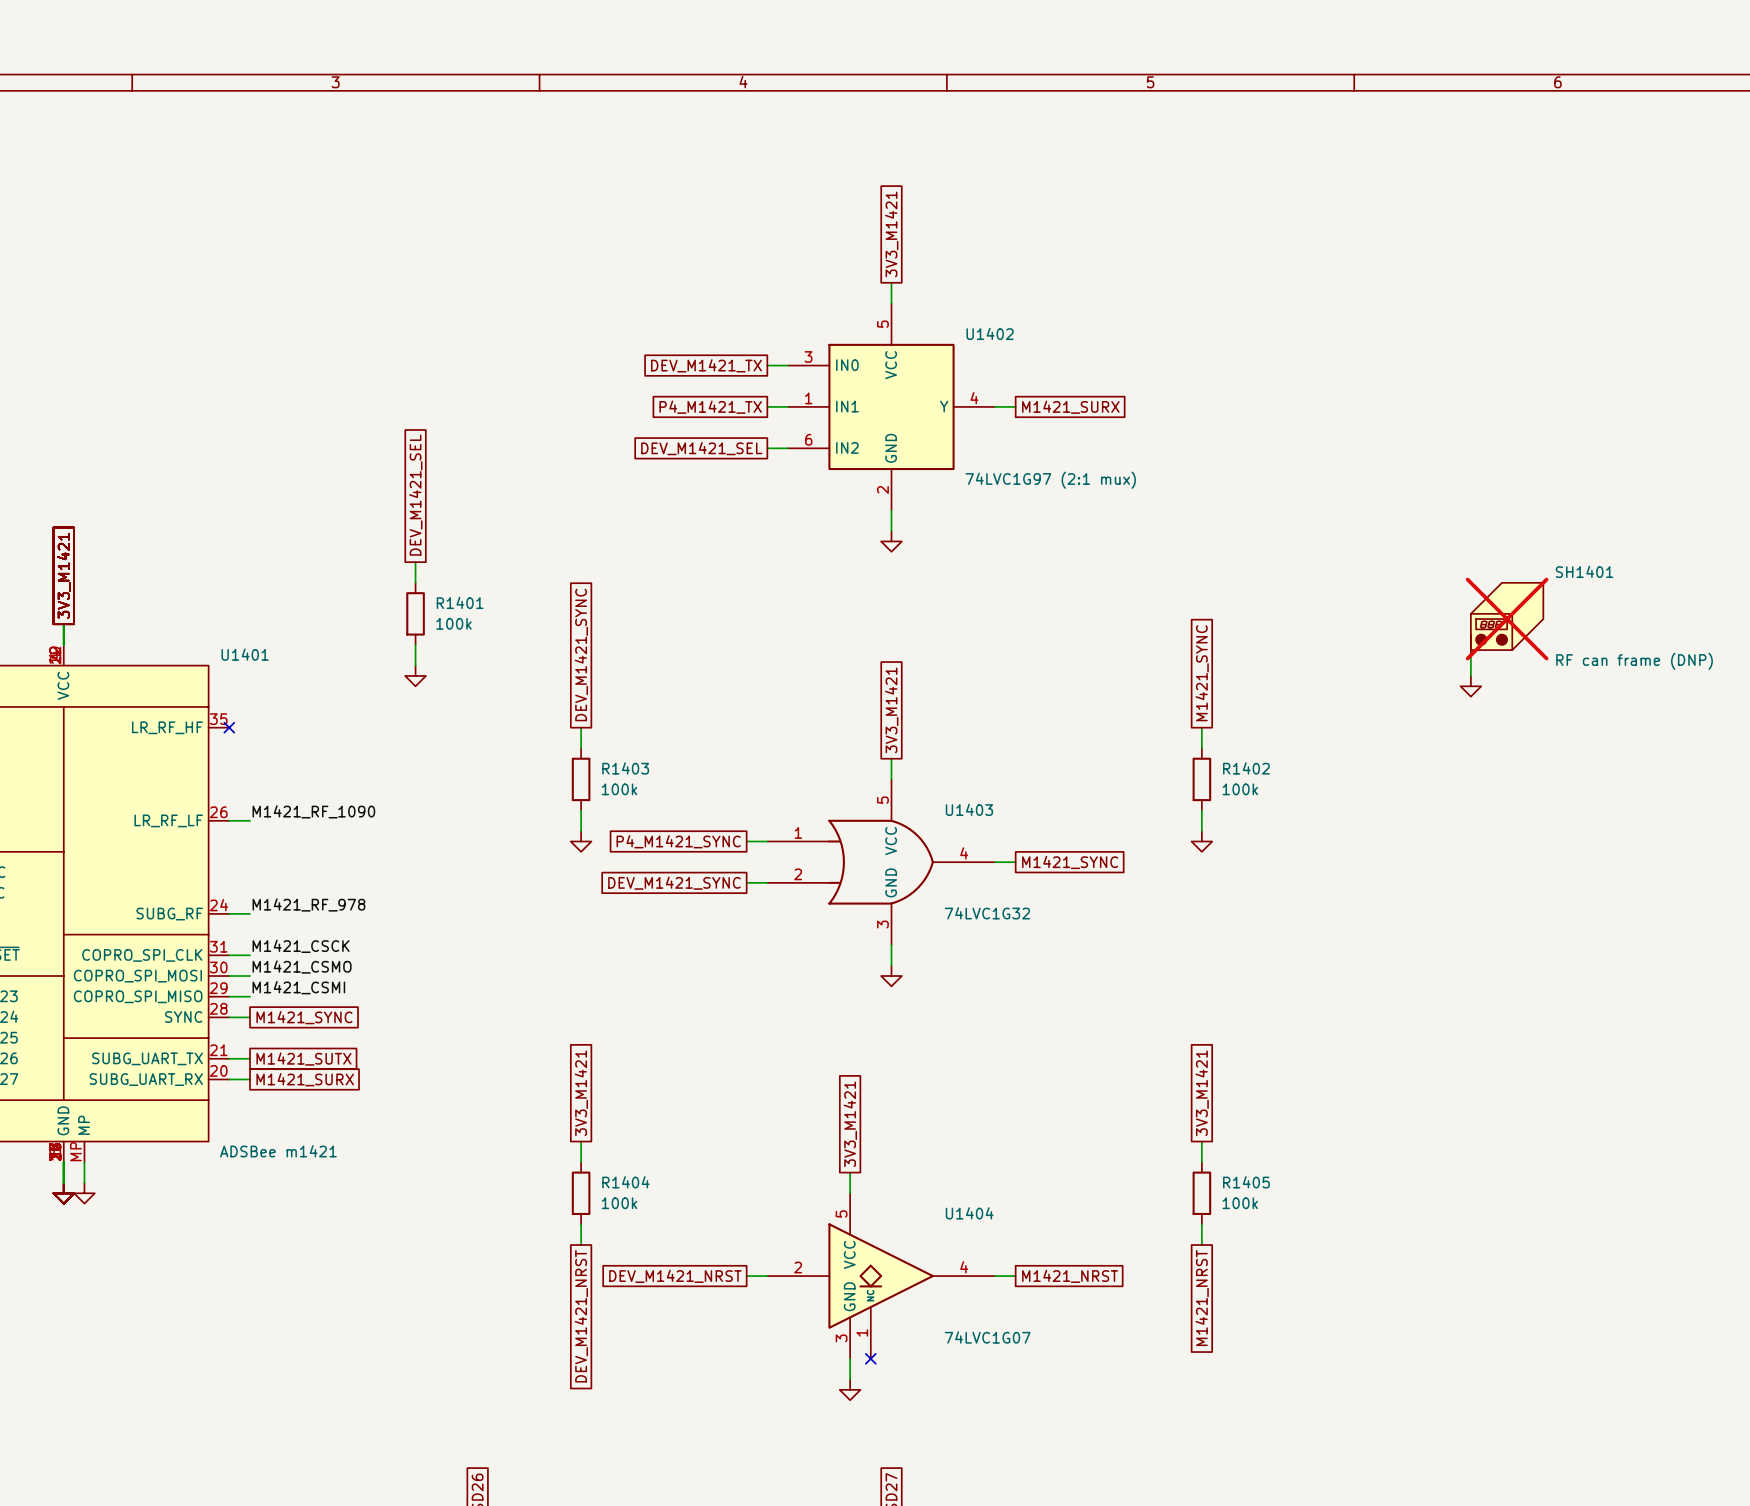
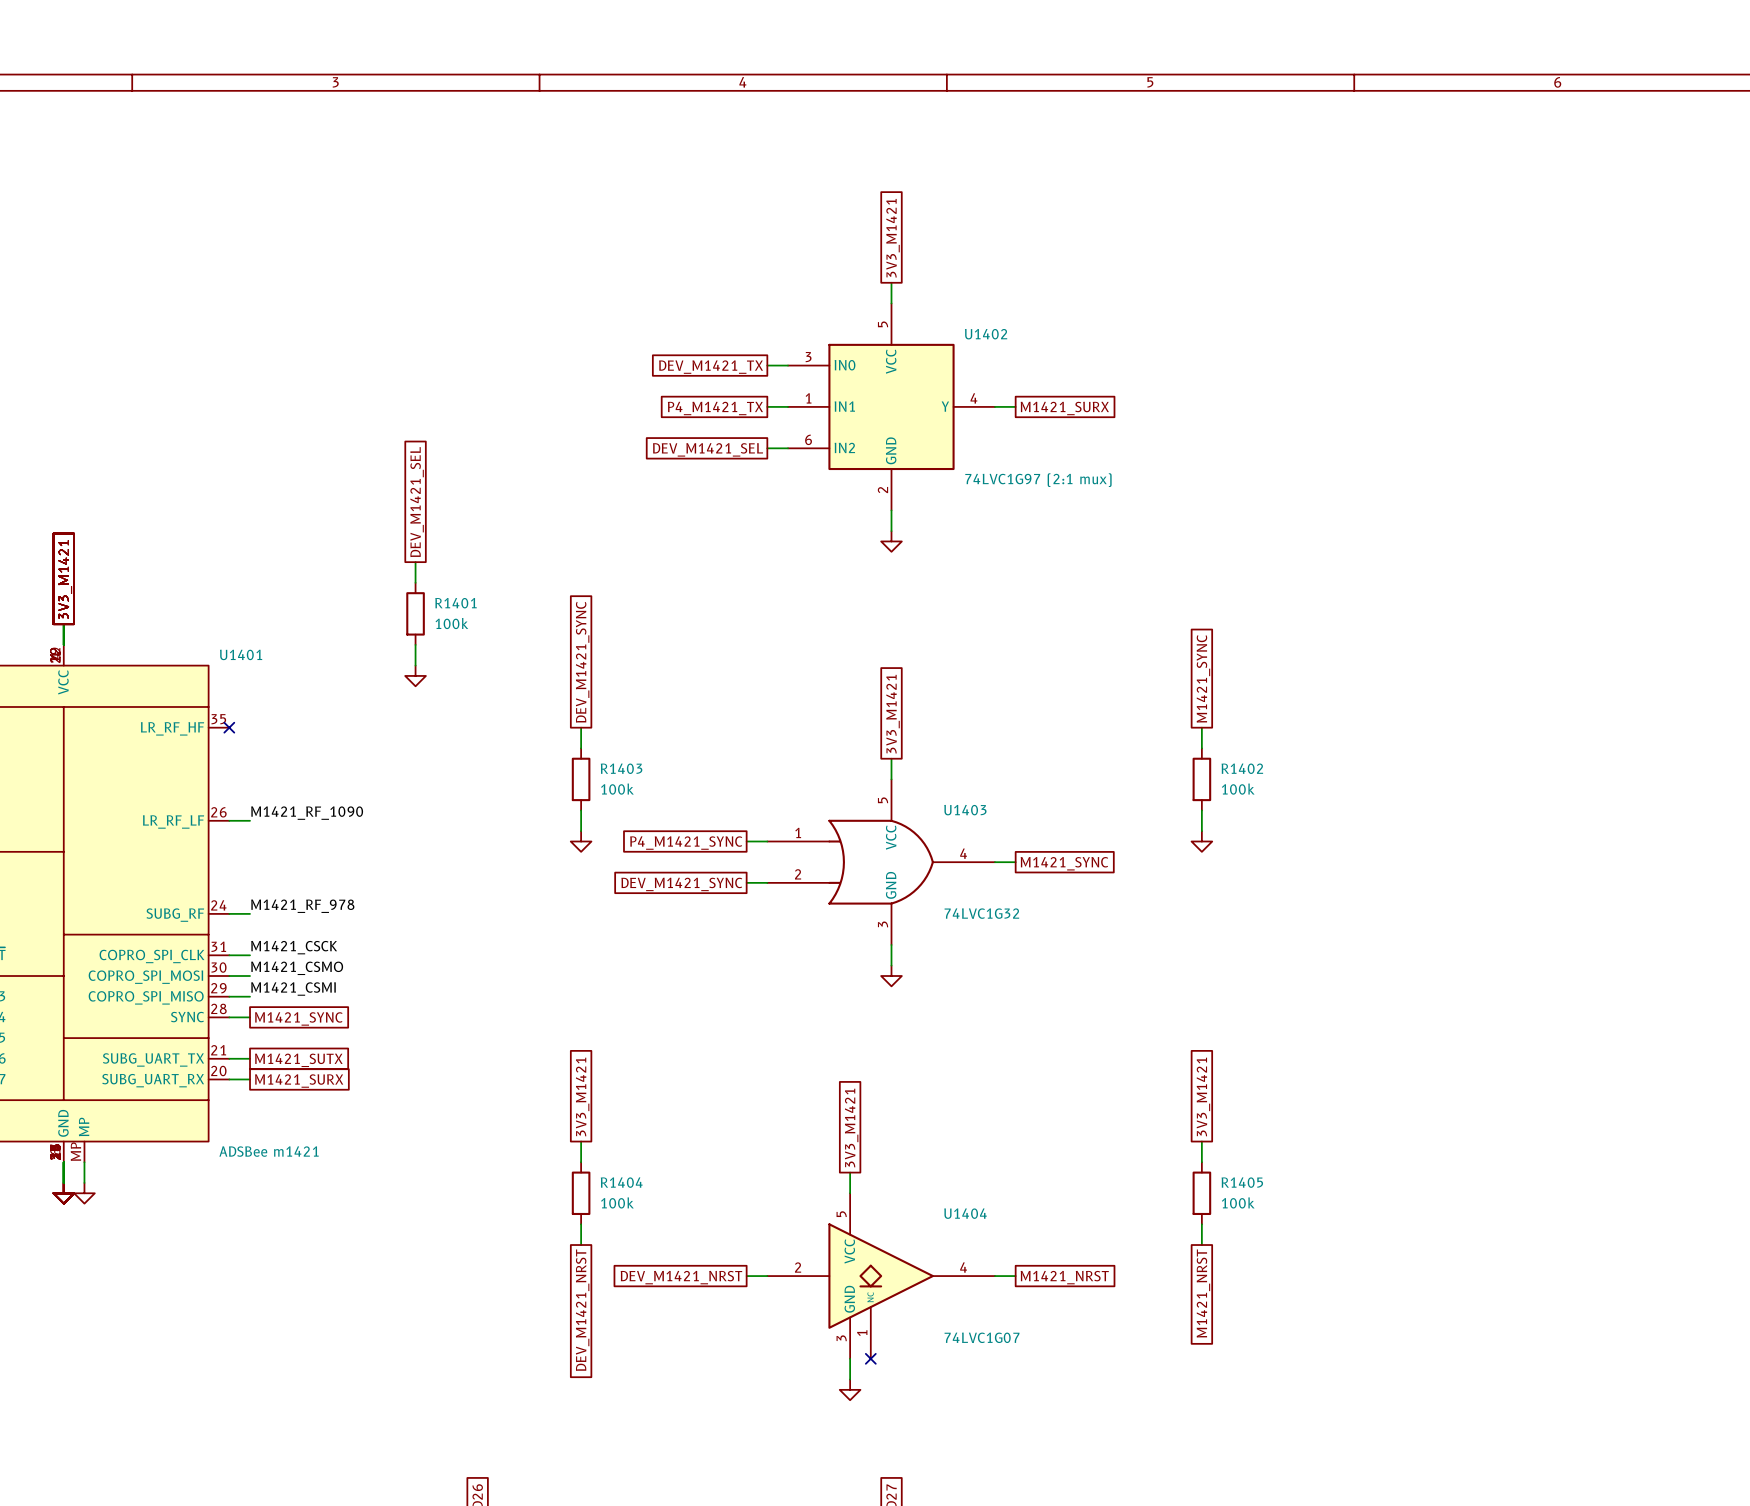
SH1401: RF can frame (DNP) (1507, 619) -> none
wire: (1470, 655) (1470, 675) -> none
power symbol: (1470, 686) -> none

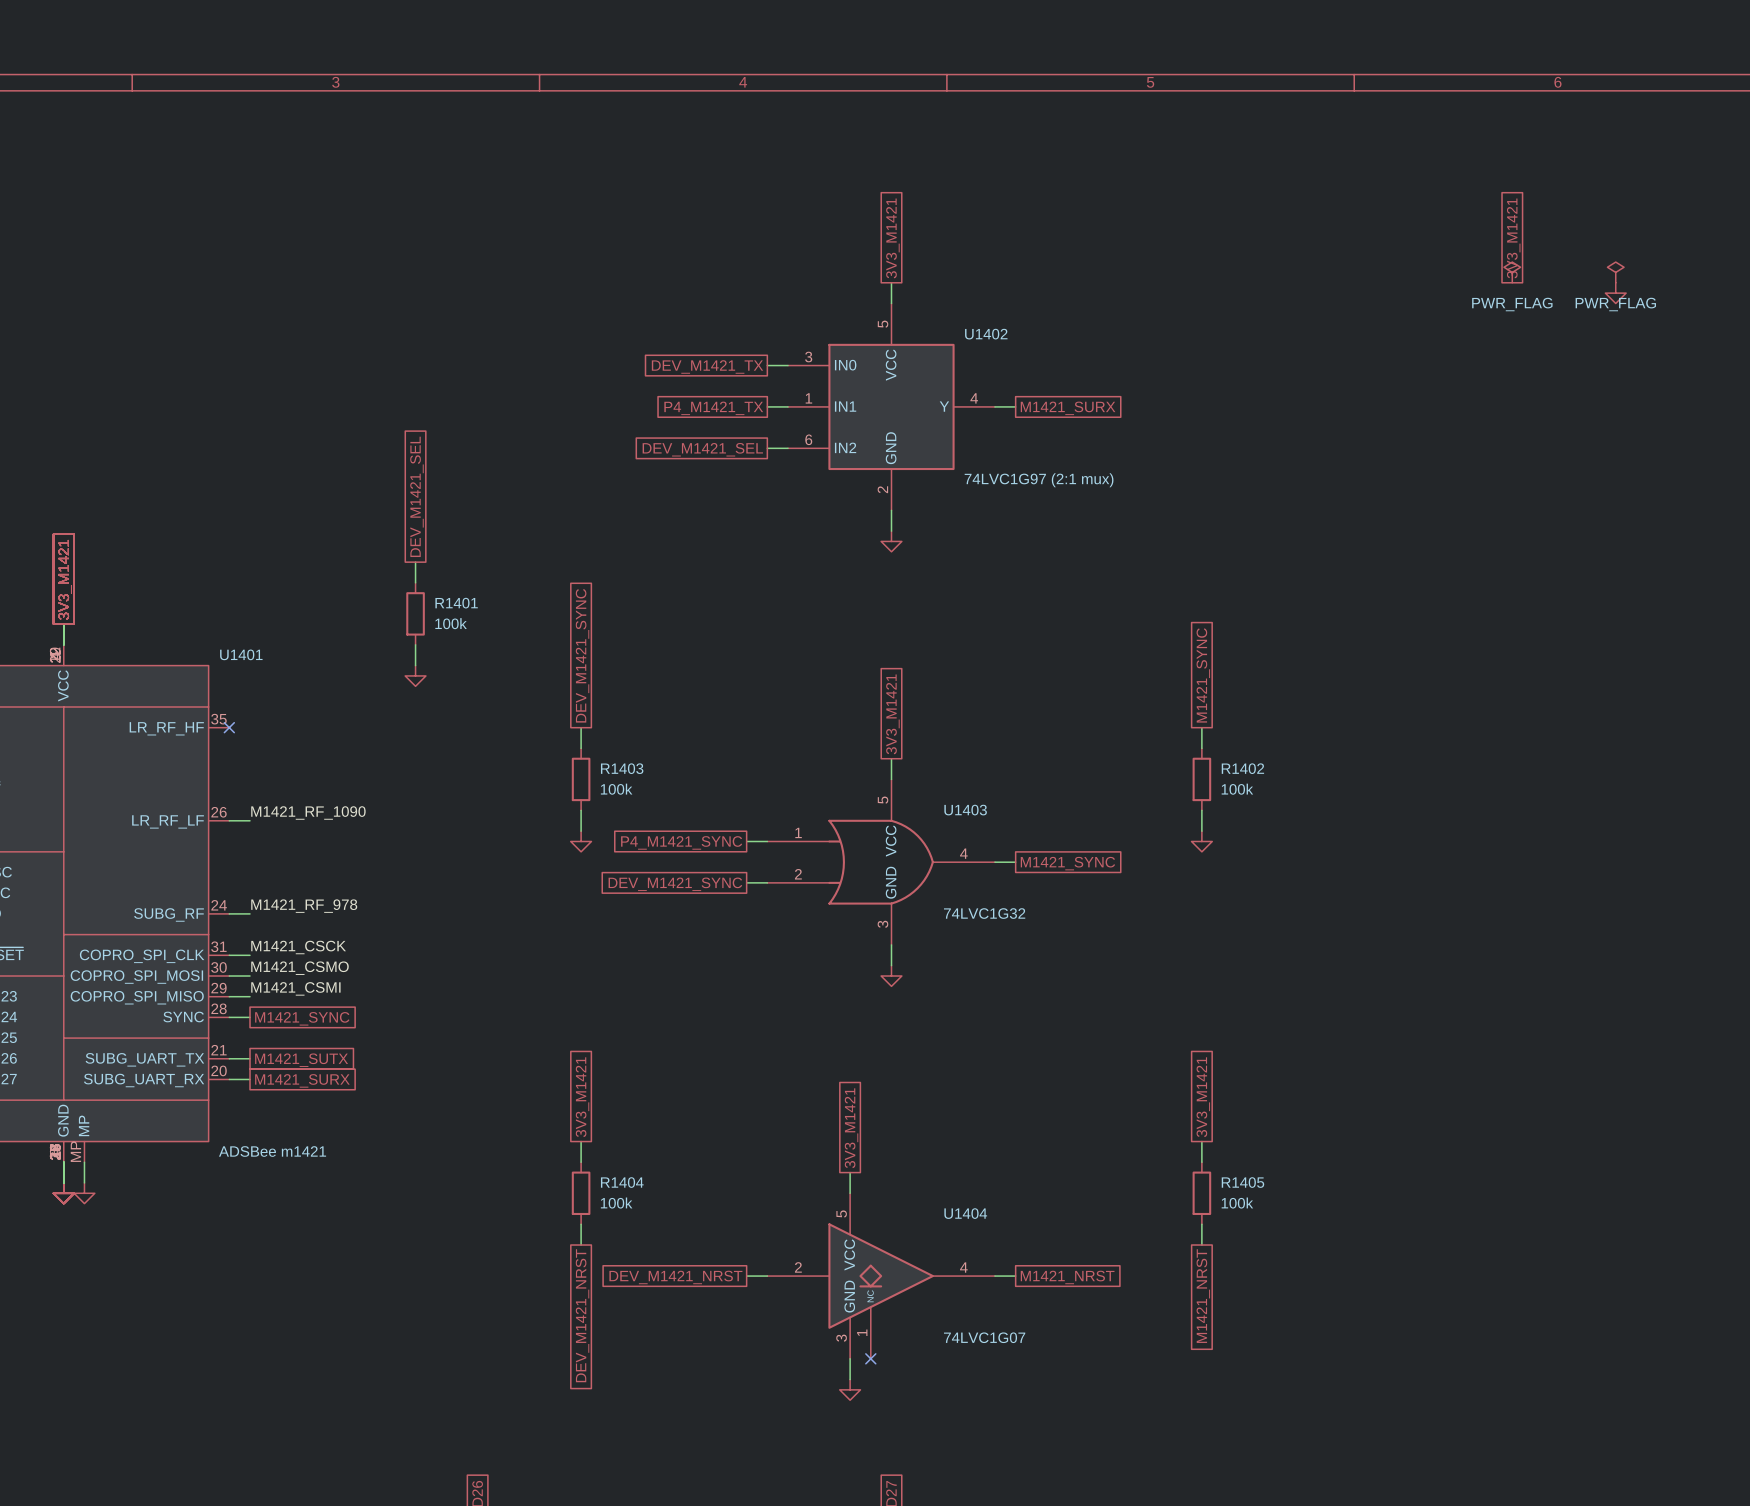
global label: none -> 3V3_M1421 (1513, 238)
power symbol: none -> PWR_FLAG (1512, 272)
power symbol: none -> PWR_FLAG (1615, 272)
power symbol: none -> (1615, 293)

